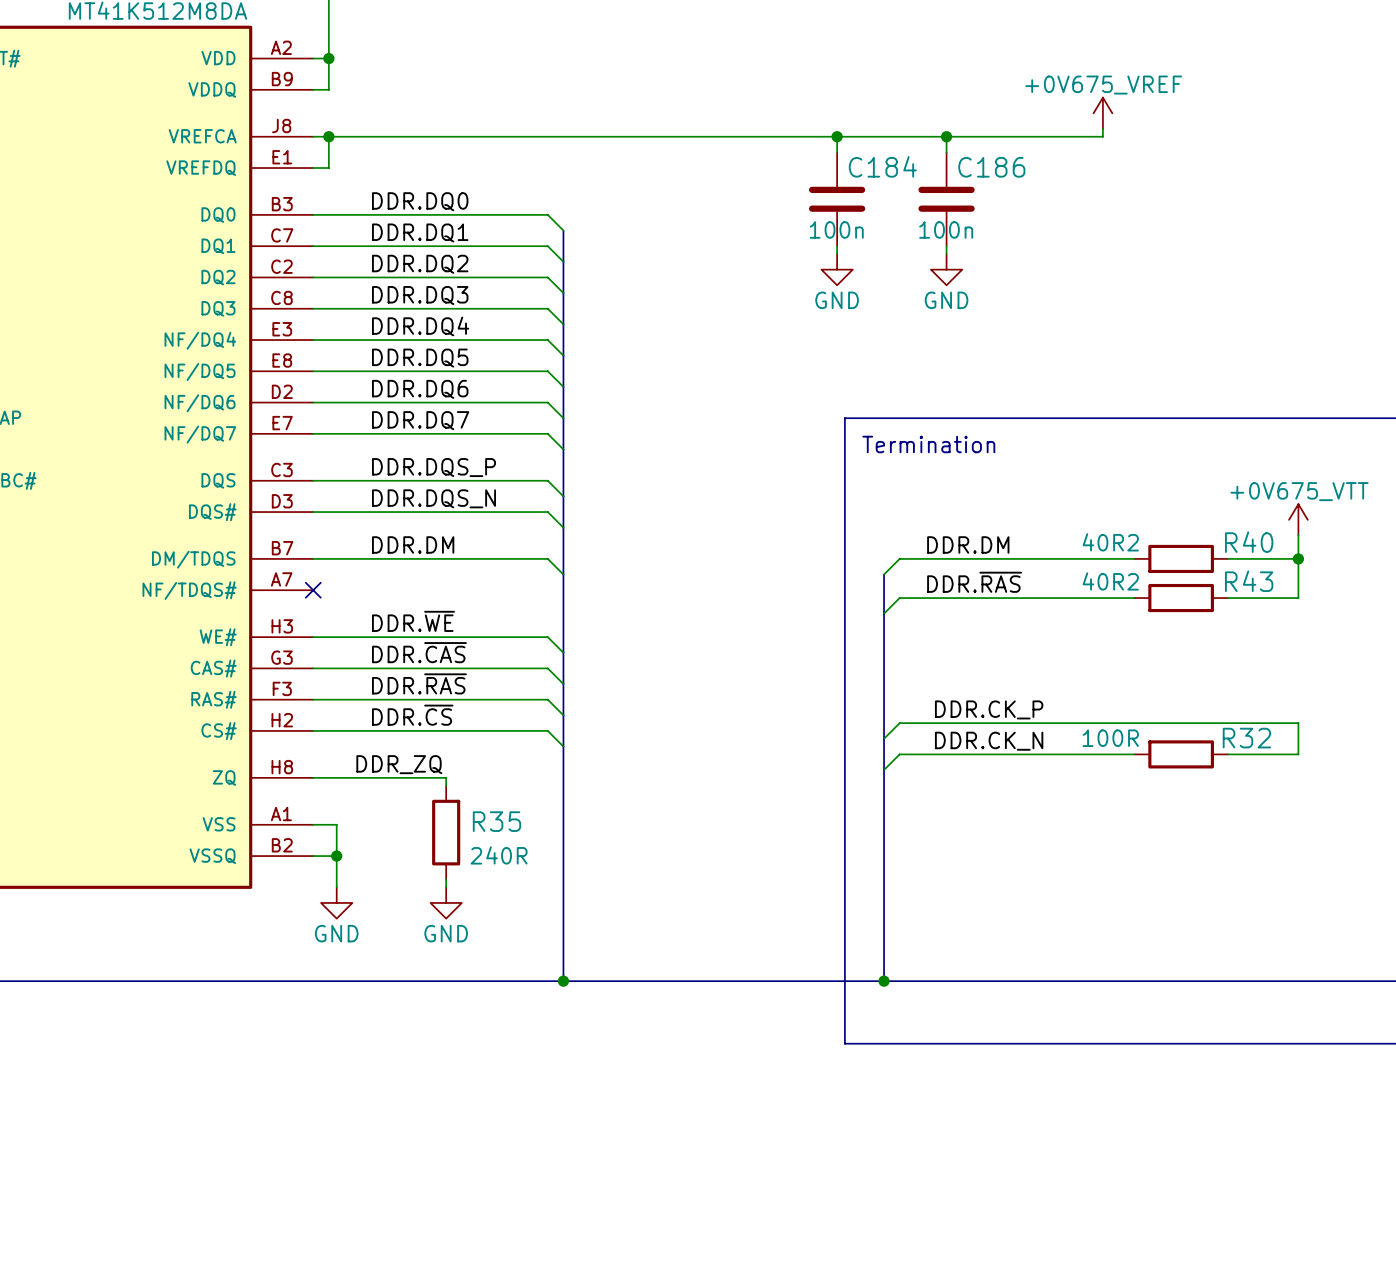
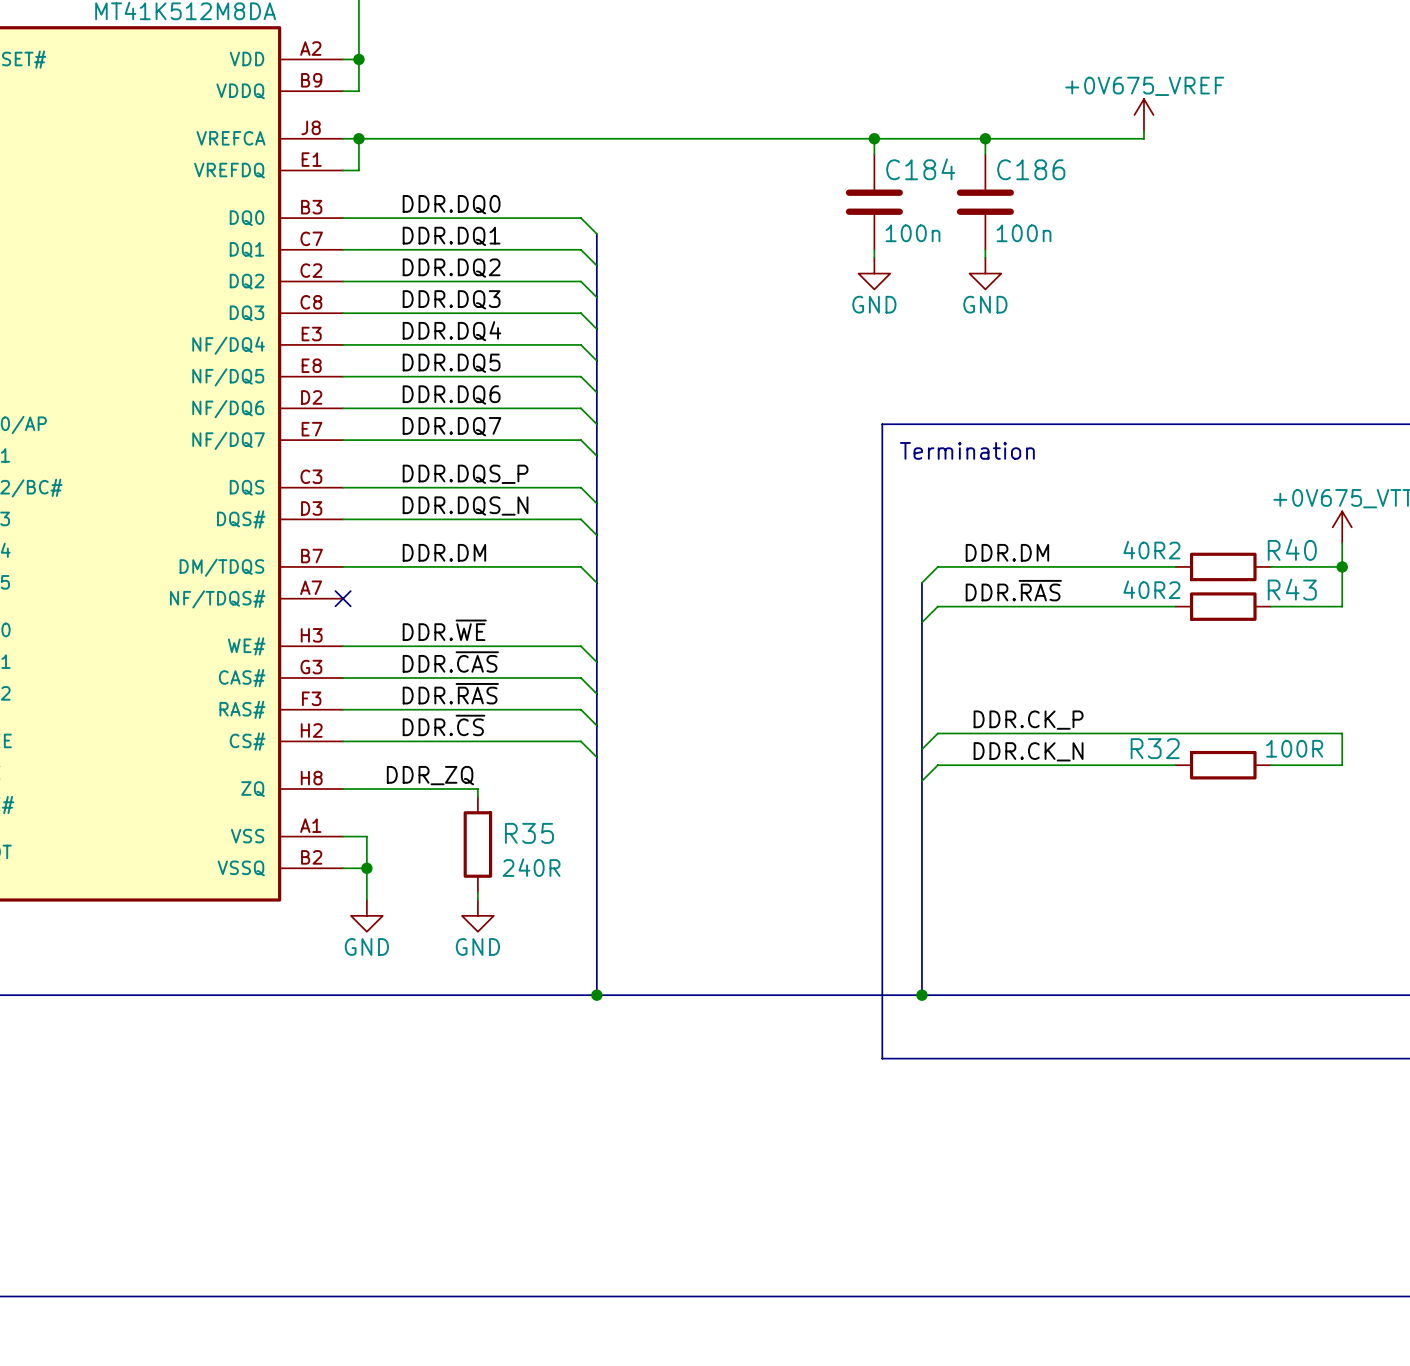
C184 text position: 100n (836, 229) -> 100n (913, 233)
C186 text position: 100n (946, 229) -> 100n (1024, 233)
R32 text position: 100R (1110, 738) -> 100R (1294, 748)
R32 name position: R32 (1246, 738) -> R32 (1155, 748)

